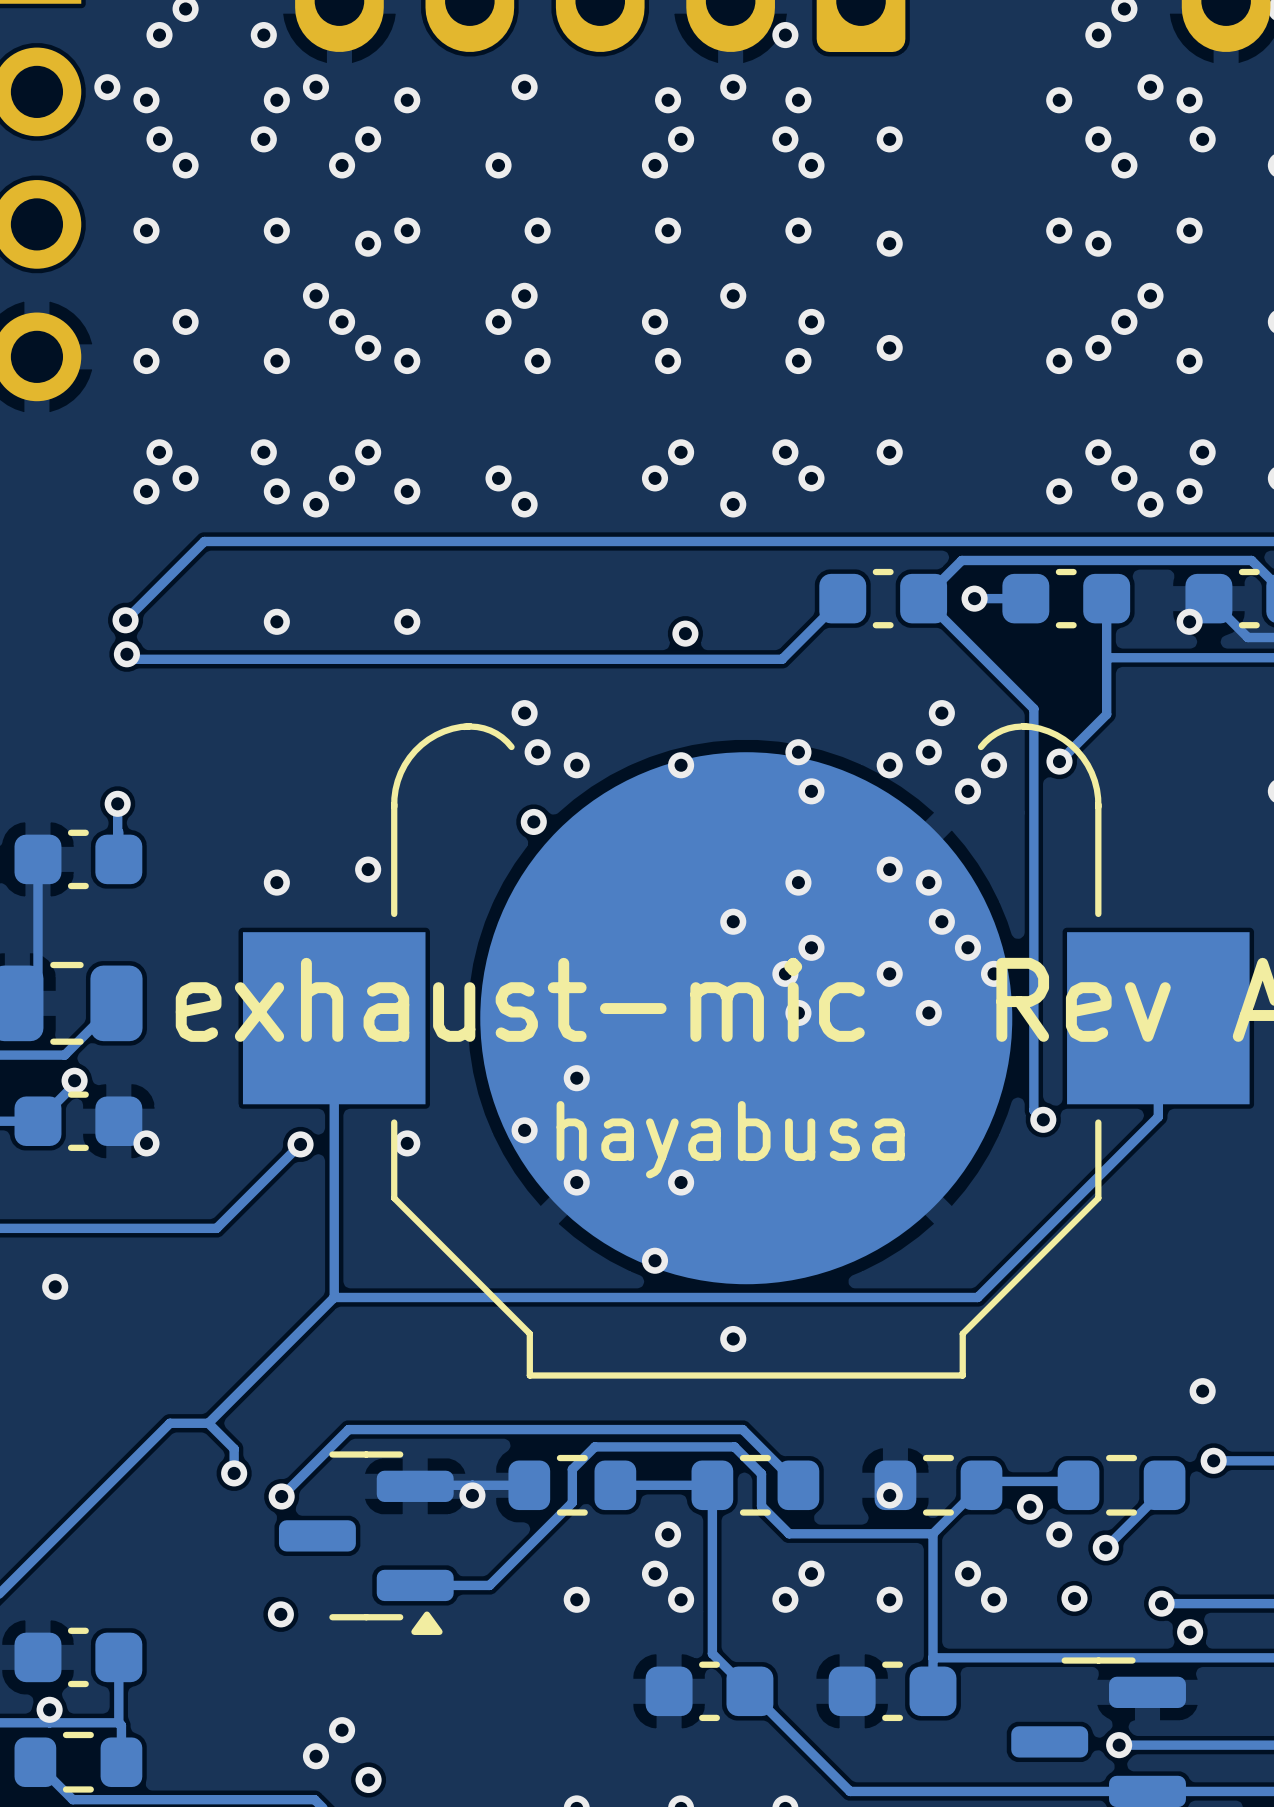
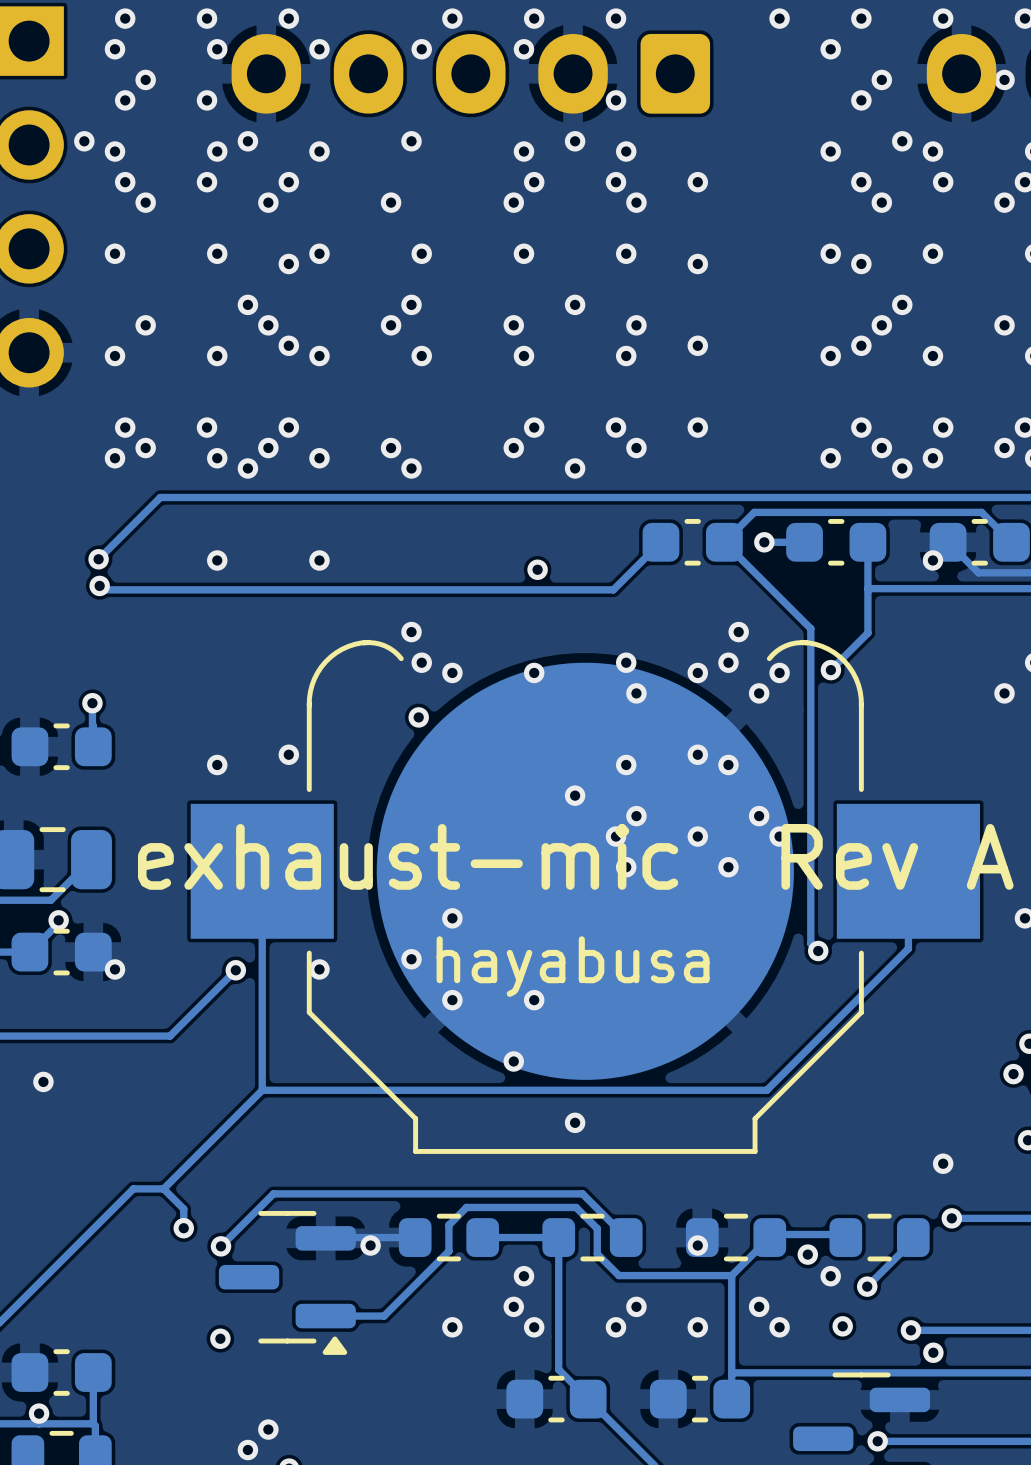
track: (37, 859) (37, 982) (17, 1003) -> none
via: (941, 921) -> none

